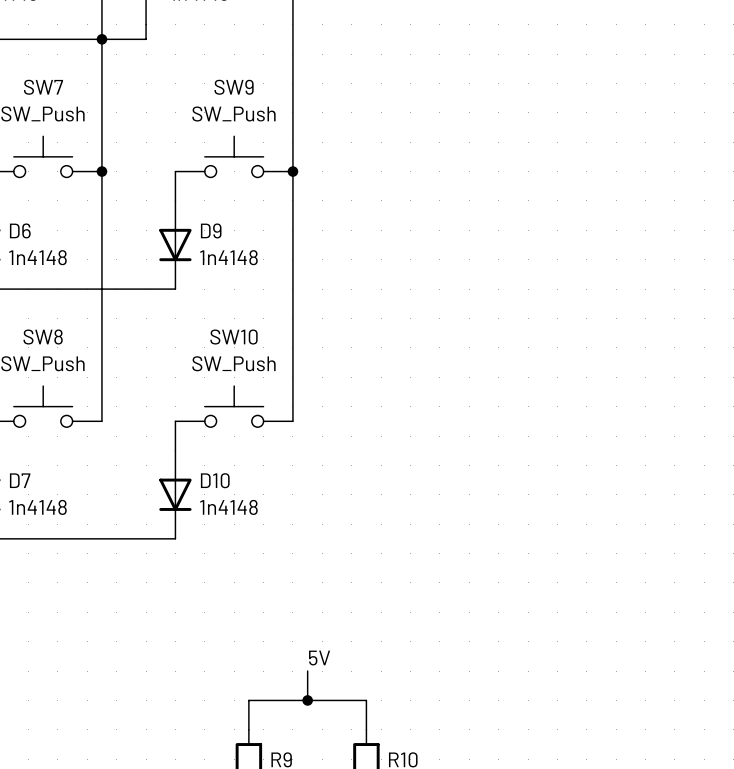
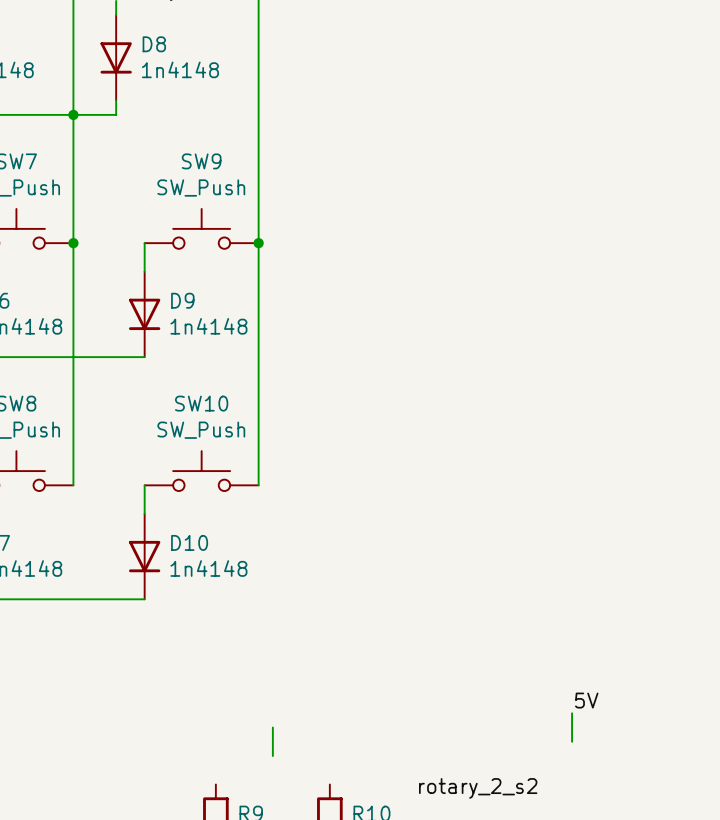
label: none -> 5V (586, 700)
wire: none -> (572, 713) (572, 741)
label: 5V (319, 658) -> none
junction: (307, 700) -> none
wire: (248, 729) (248, 700) (366, 700) (366, 729) -> none
label: none -> rotary_2_s2 (478, 788)

